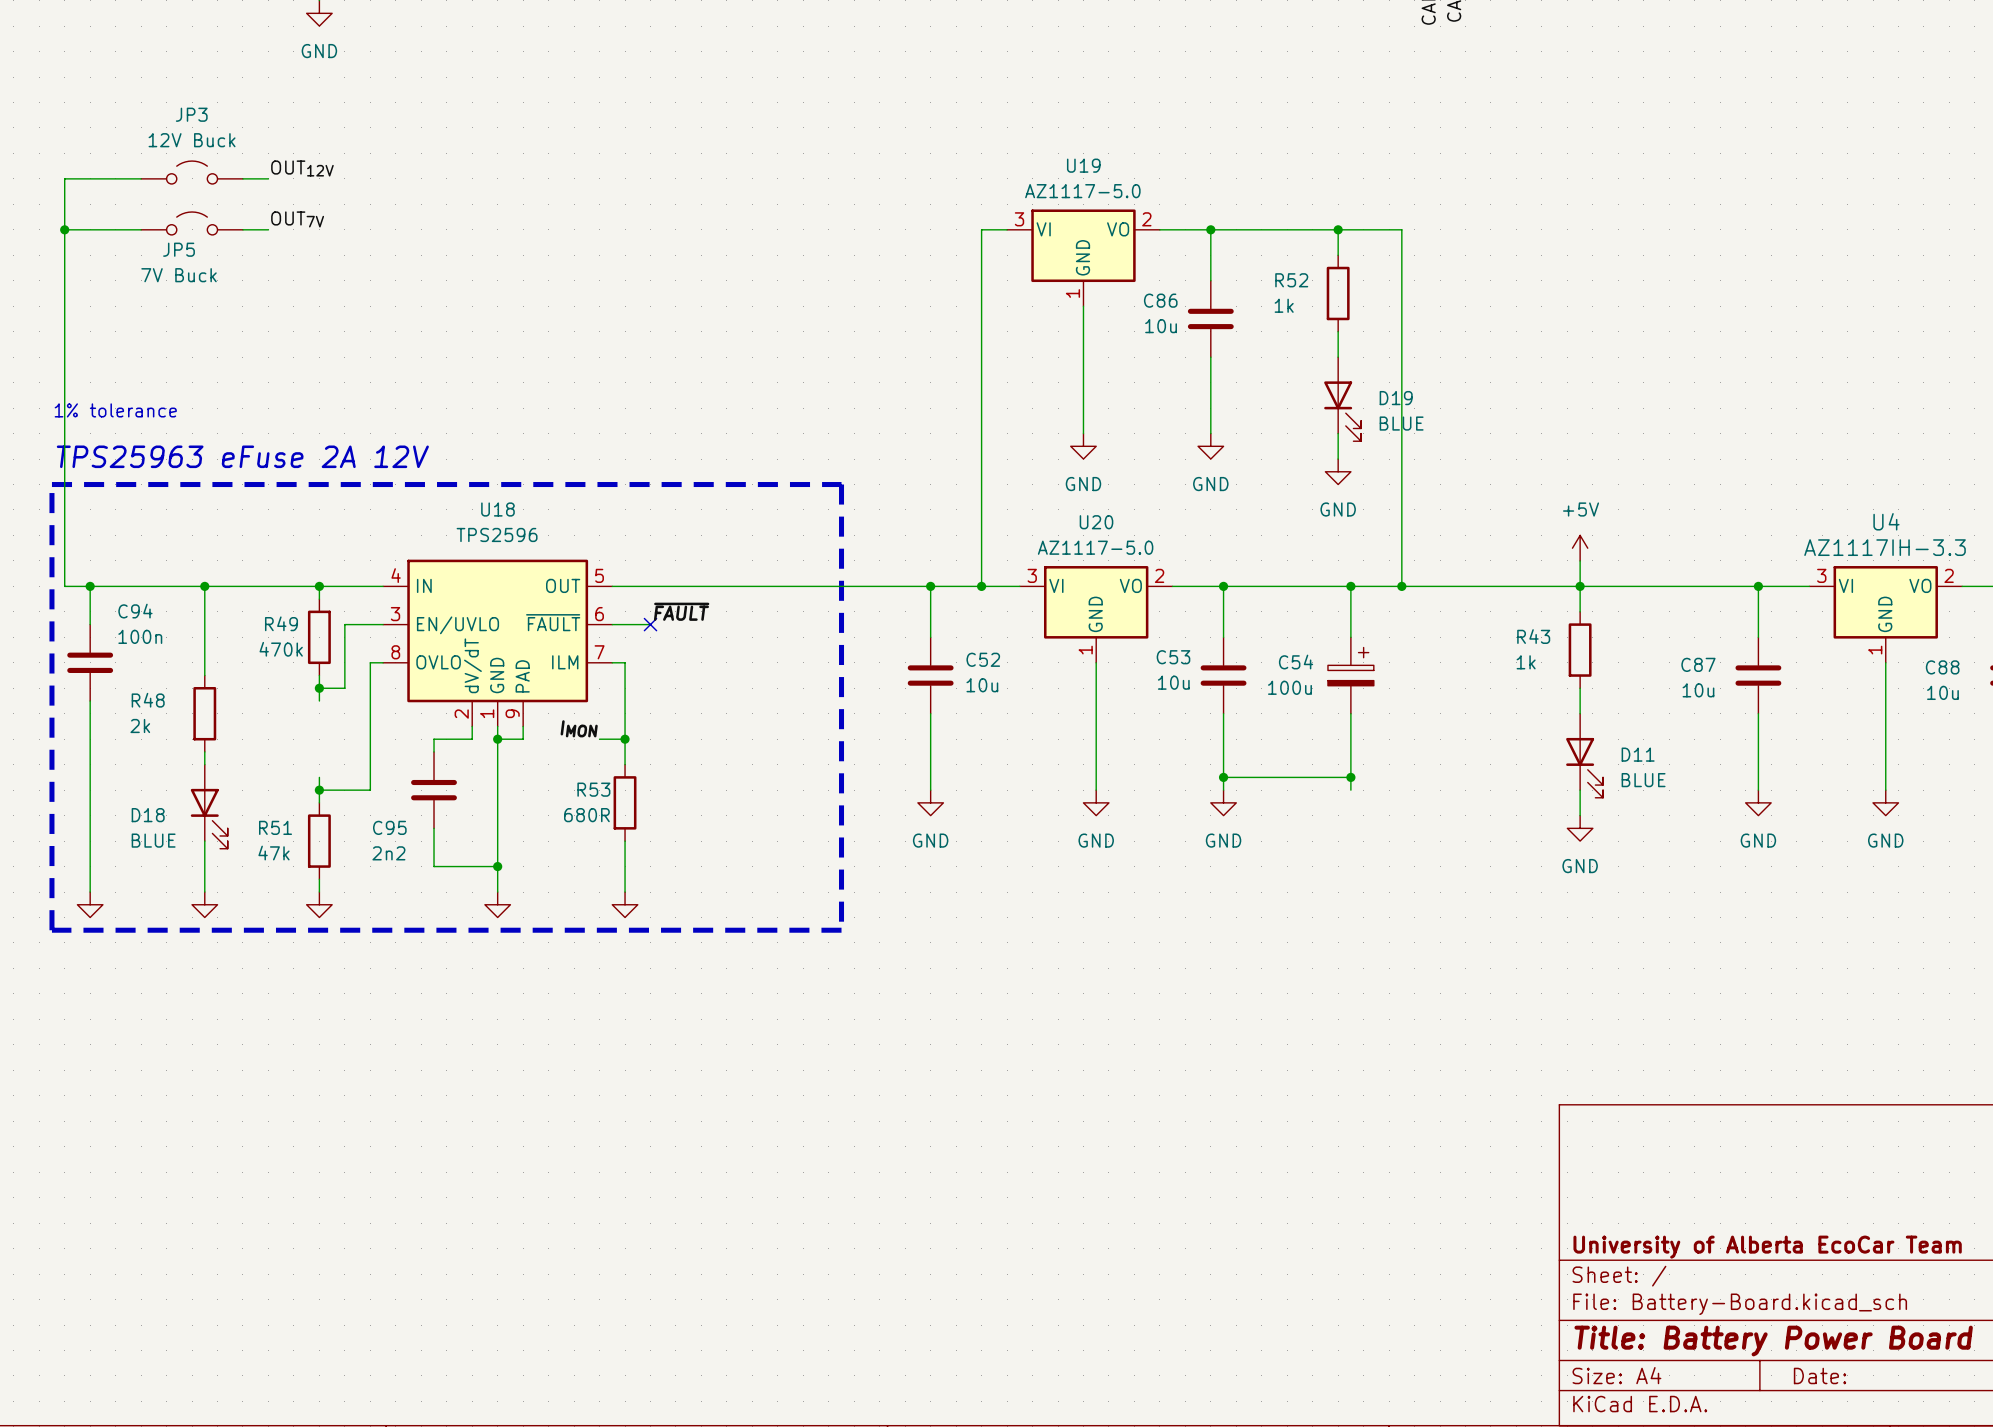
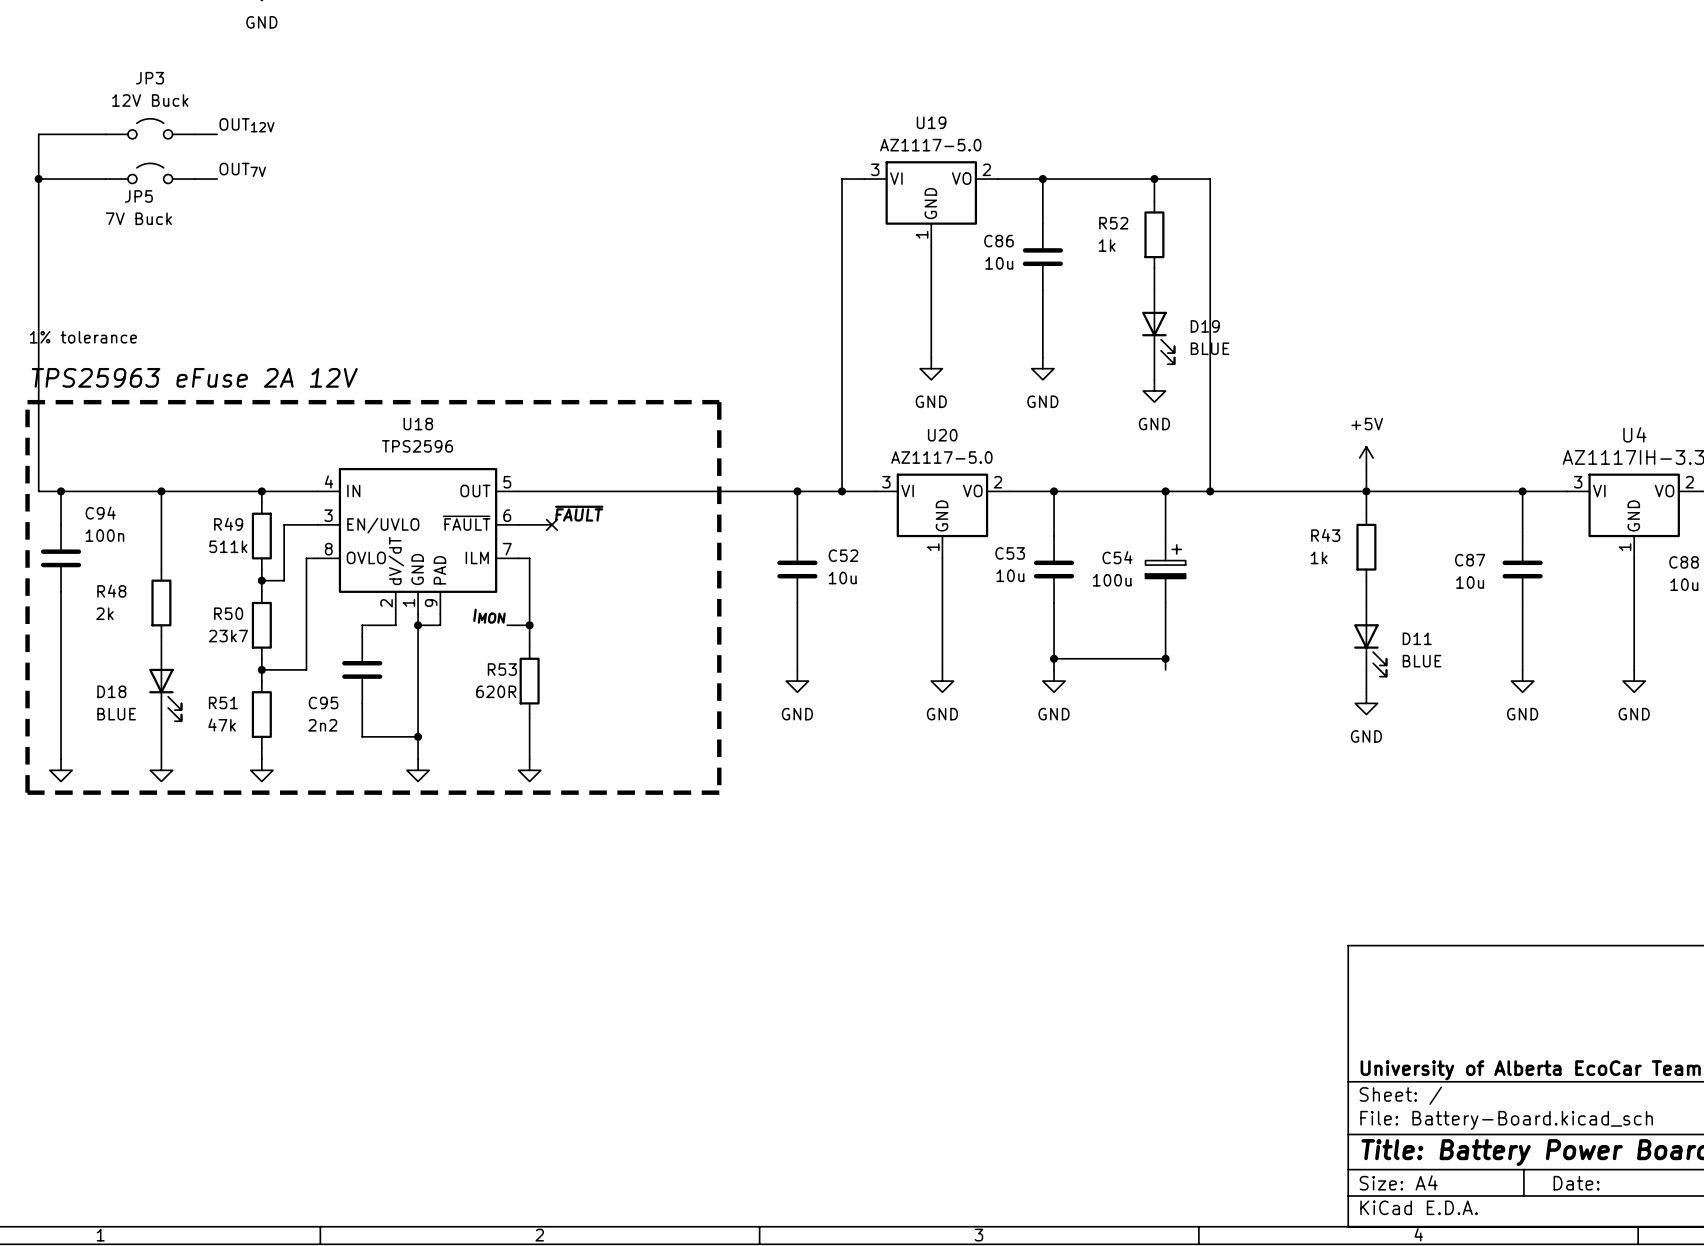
R49 value: 470k (281, 649) -> 511k (228, 546)
R50: none -> 23k7 (261, 625)
R53 value: 680R (586, 815) -> 620R (496, 691)

